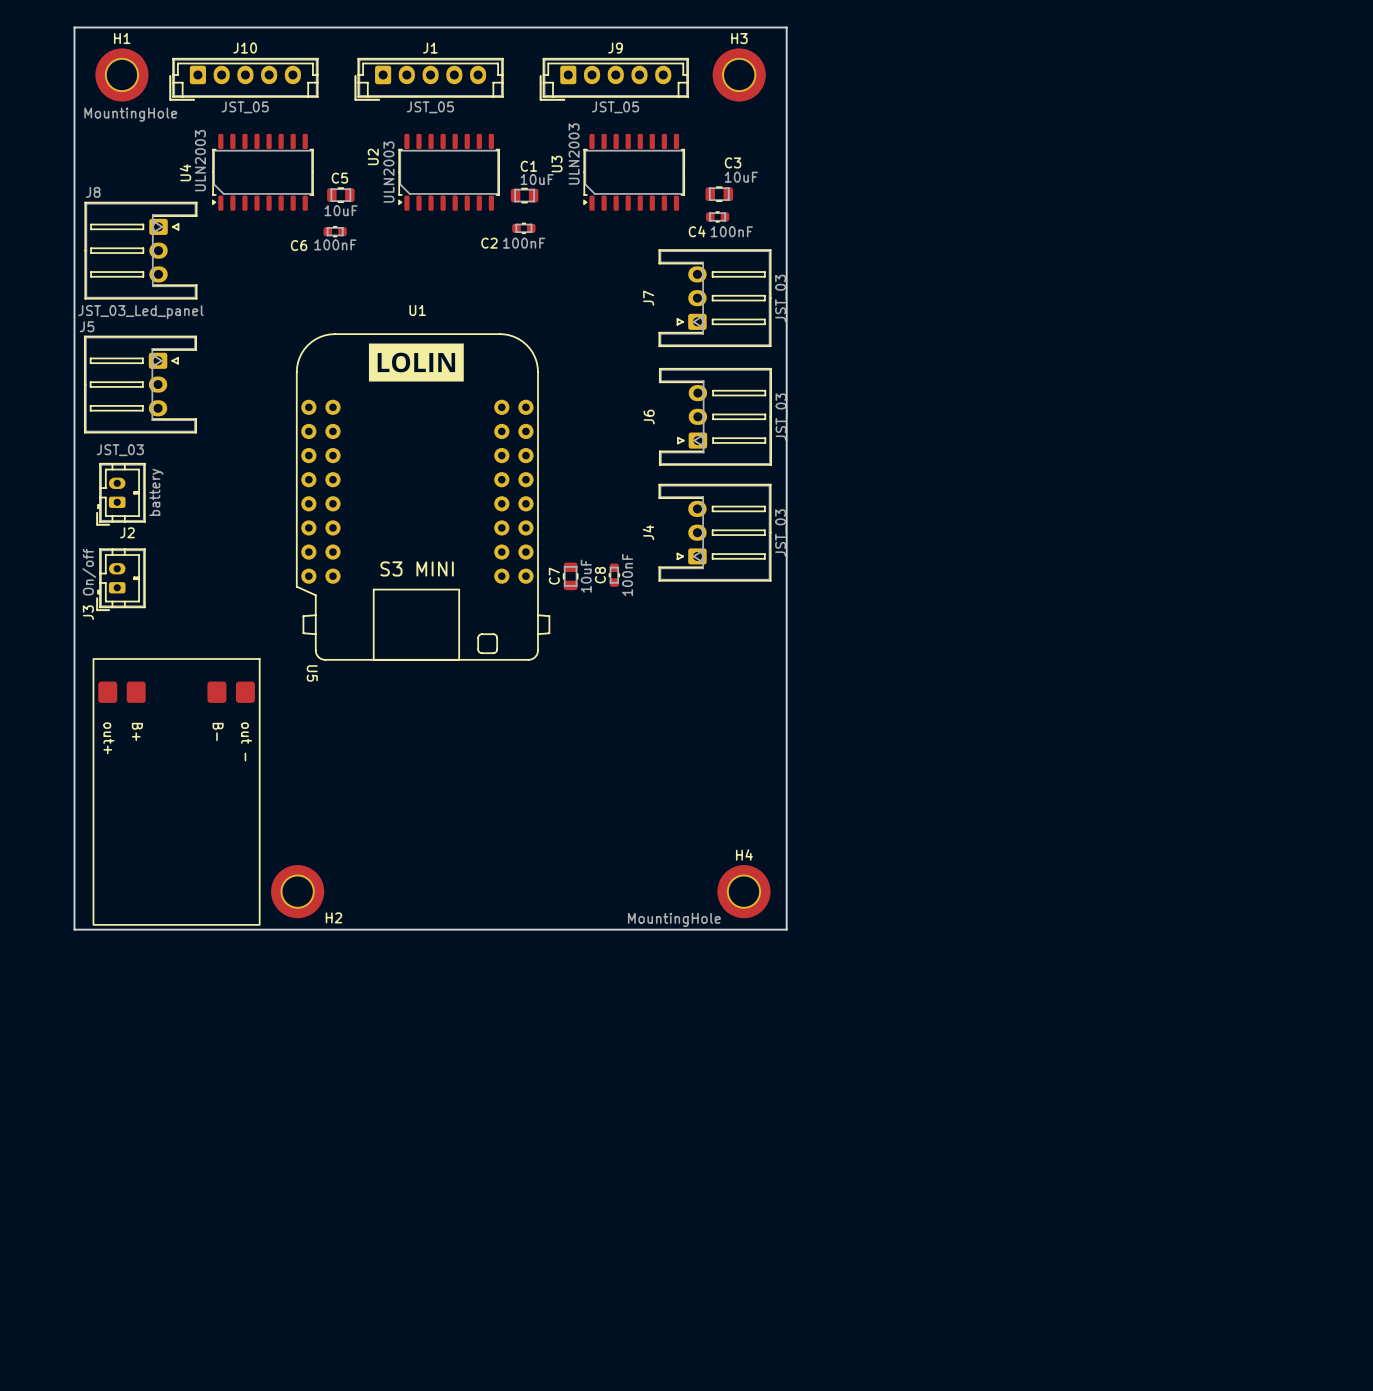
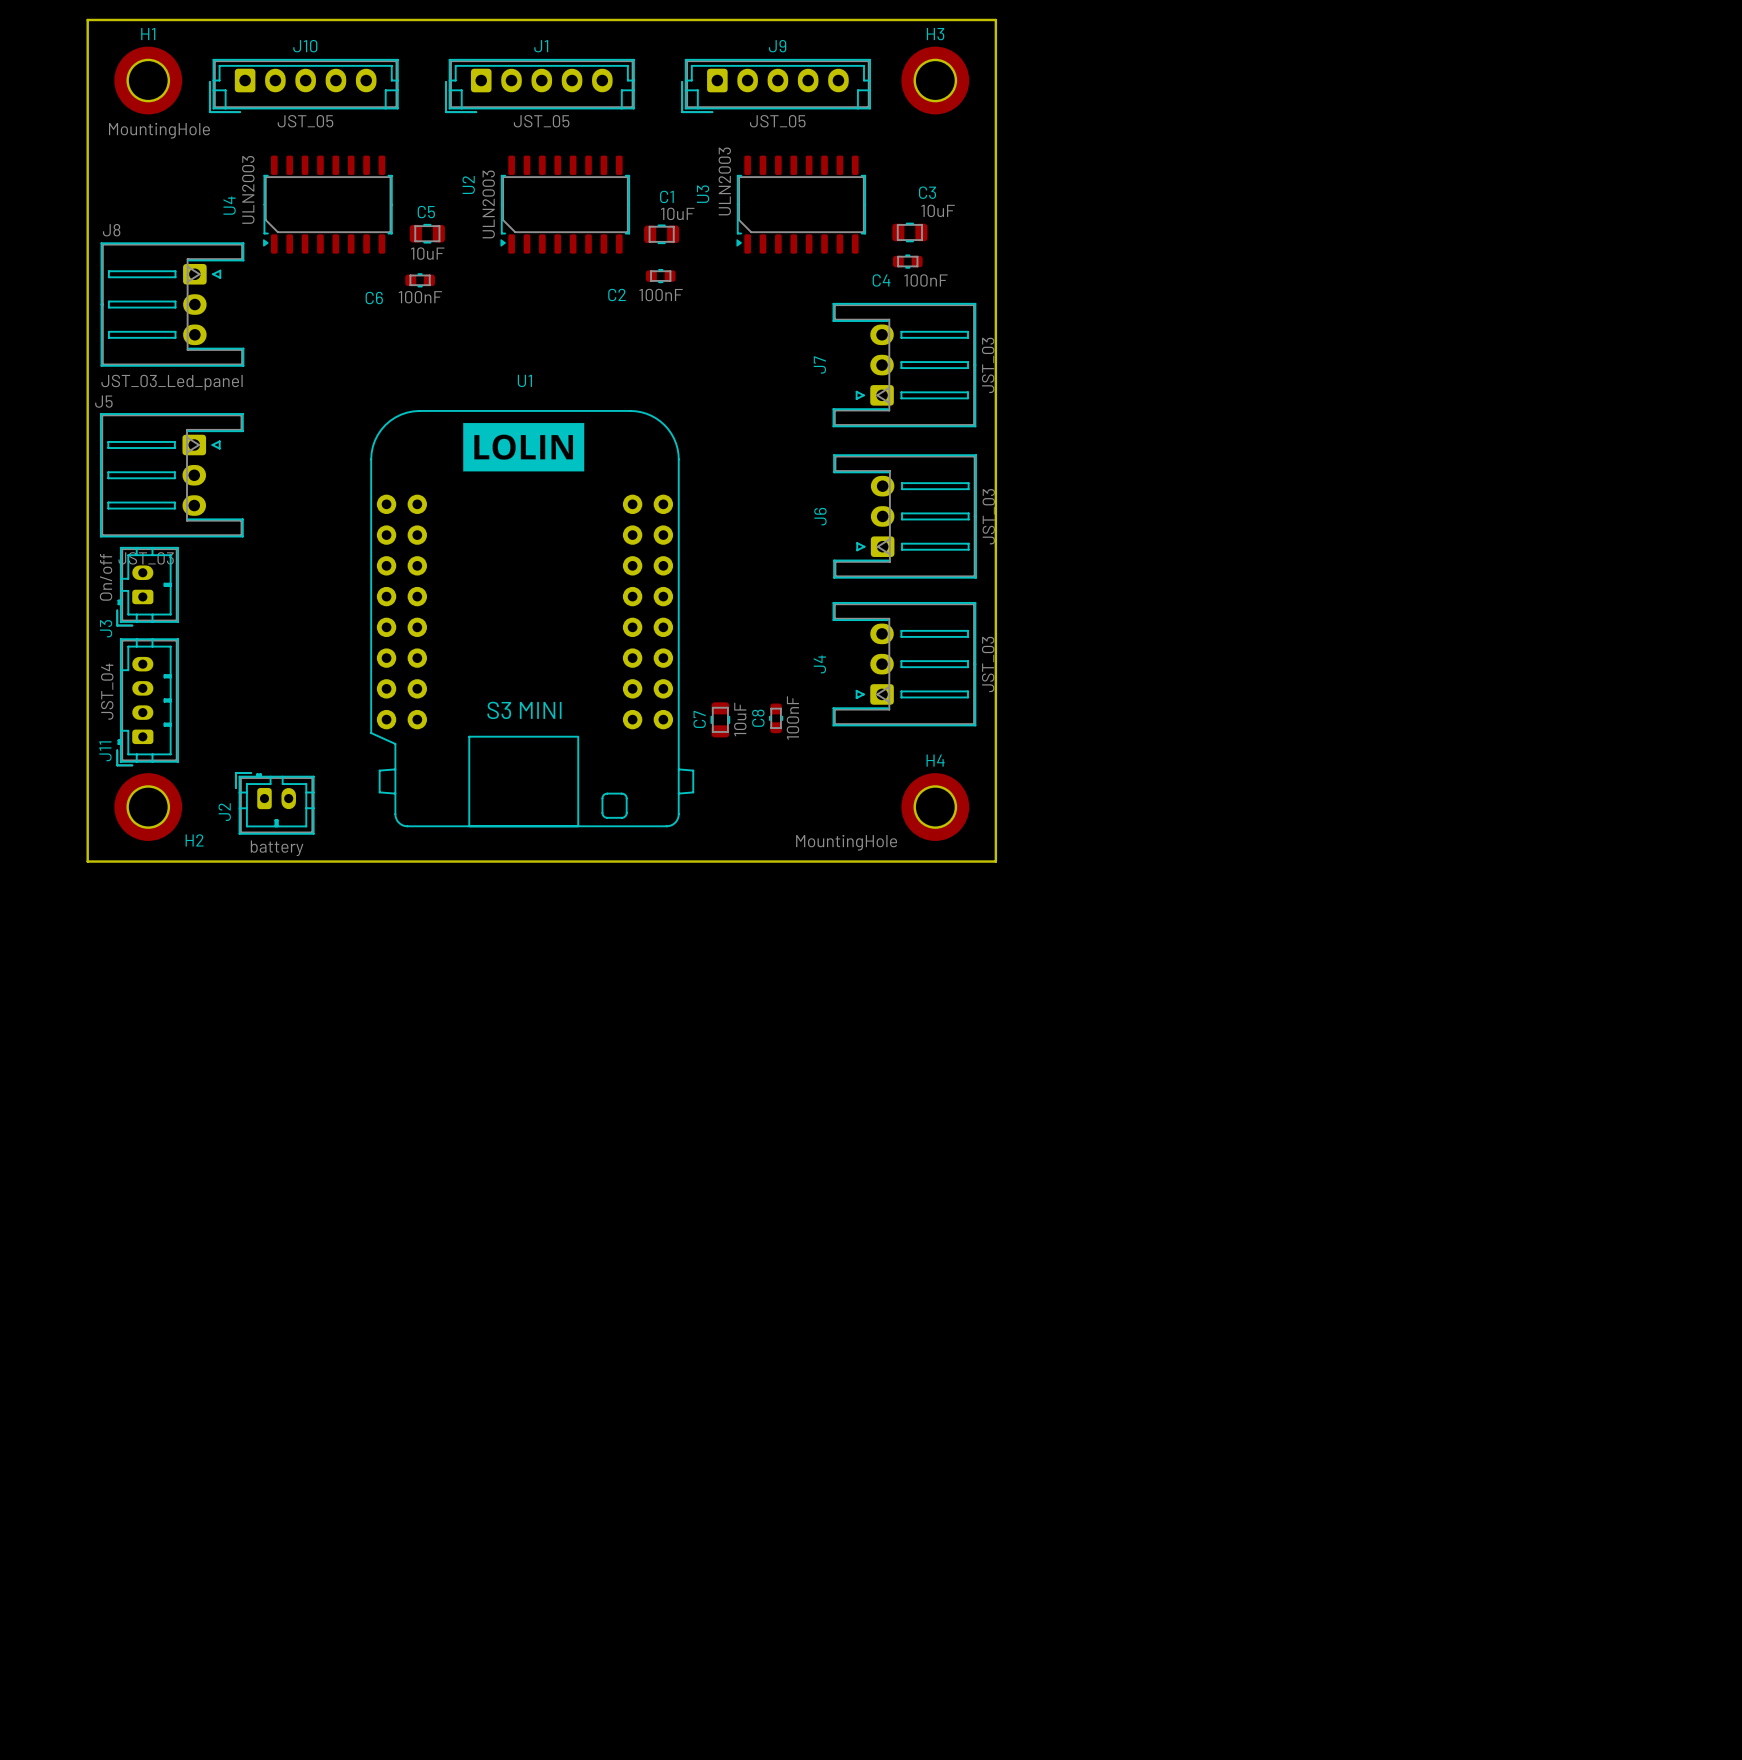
J2 rotation: 0° (121, 494) -> 90° clockwise (274, 803)
J2 position: (121, 494) -> (274, 803)
J11: none -> JST_04 (147, 702)
J3 position: (121, 579) -> (147, 586)
board edge: (74, 687) (74, 929) (786, 929) (786, 687) -> (87, 861) (995, 861)
U5: (176, 791) -> none
H2 position: (297, 891) -> (148, 807)
H4 position: (743, 891) -> (935, 807)

